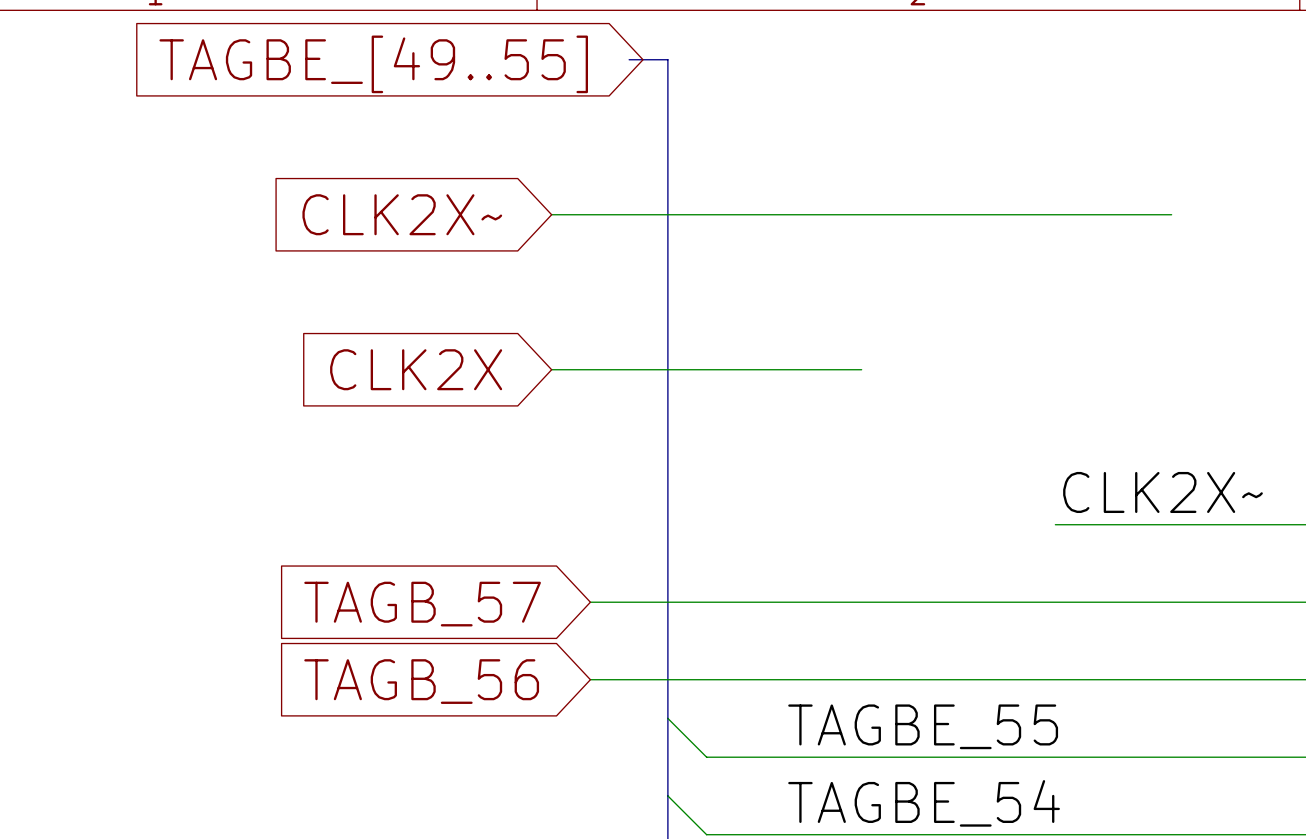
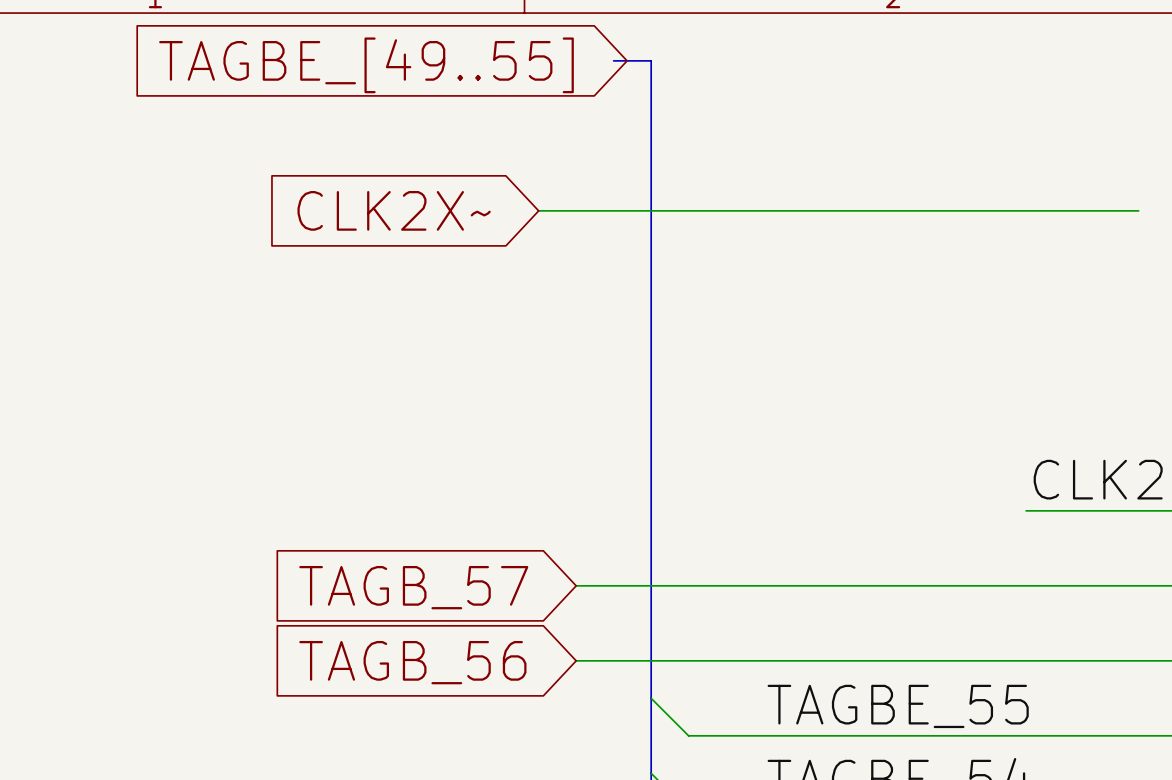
global label: CLK2X (416, 369) -> none
wire: (551, 369) (861, 369) -> none

